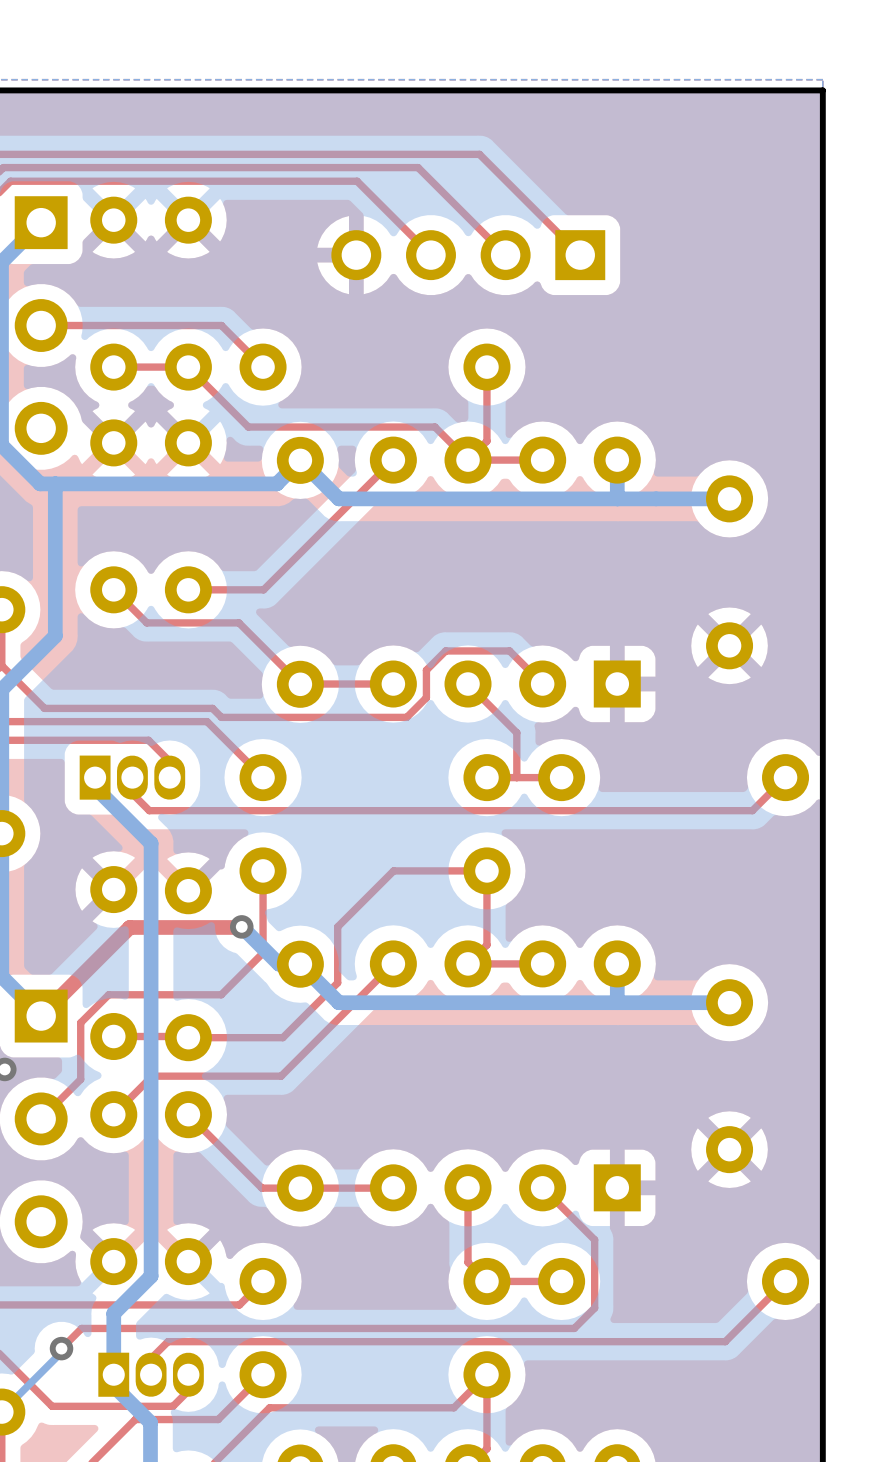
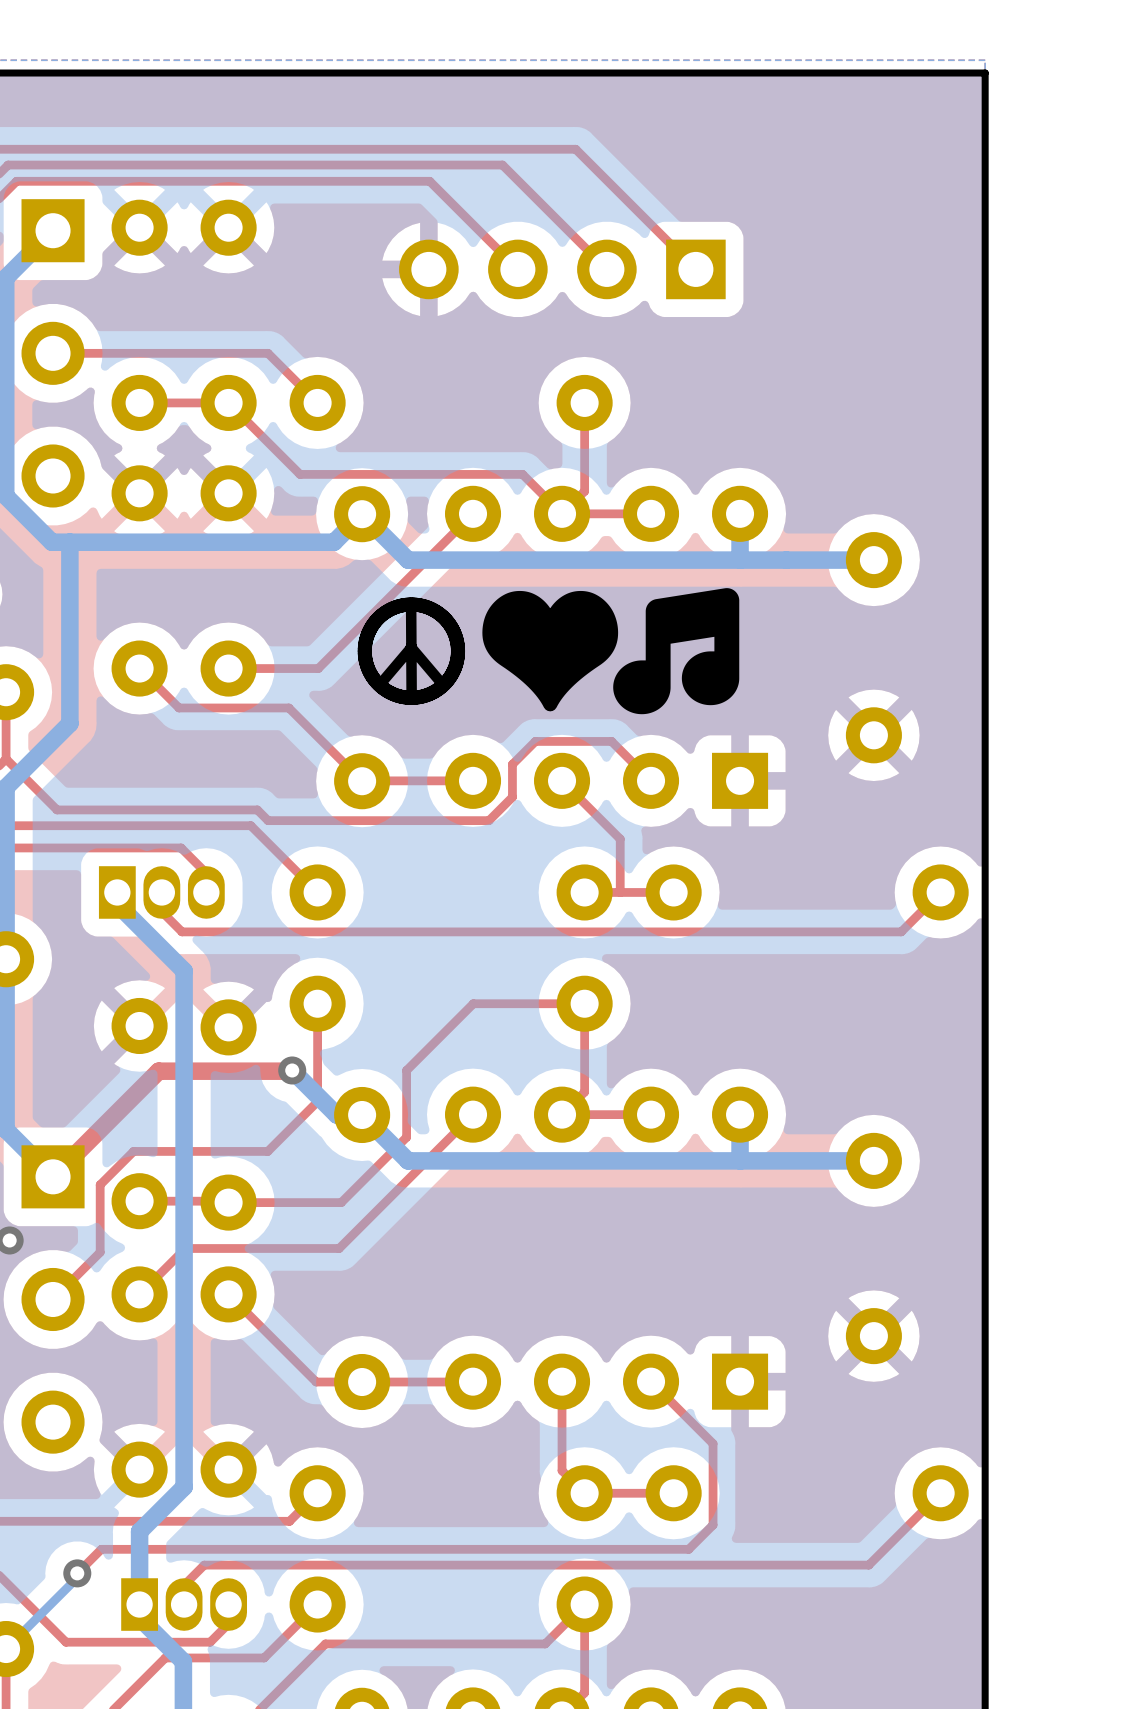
drawing: none -> [482, 588, 740, 715]
line: none -> (416, 604) (397, 606) (381, 615) (370, 628) (365, 646) (366, 665) (375, 680) (389, 692) (406, 697) (425, 695) (441, 687) (452, 673) (457, 655) (455, 637) (447, 621) (433, 610) (416, 604)
line: none -> (411, 608) (411, 694)
line: none -> (410, 646) (441, 682)
line: none -> (411, 647) (381, 683)

